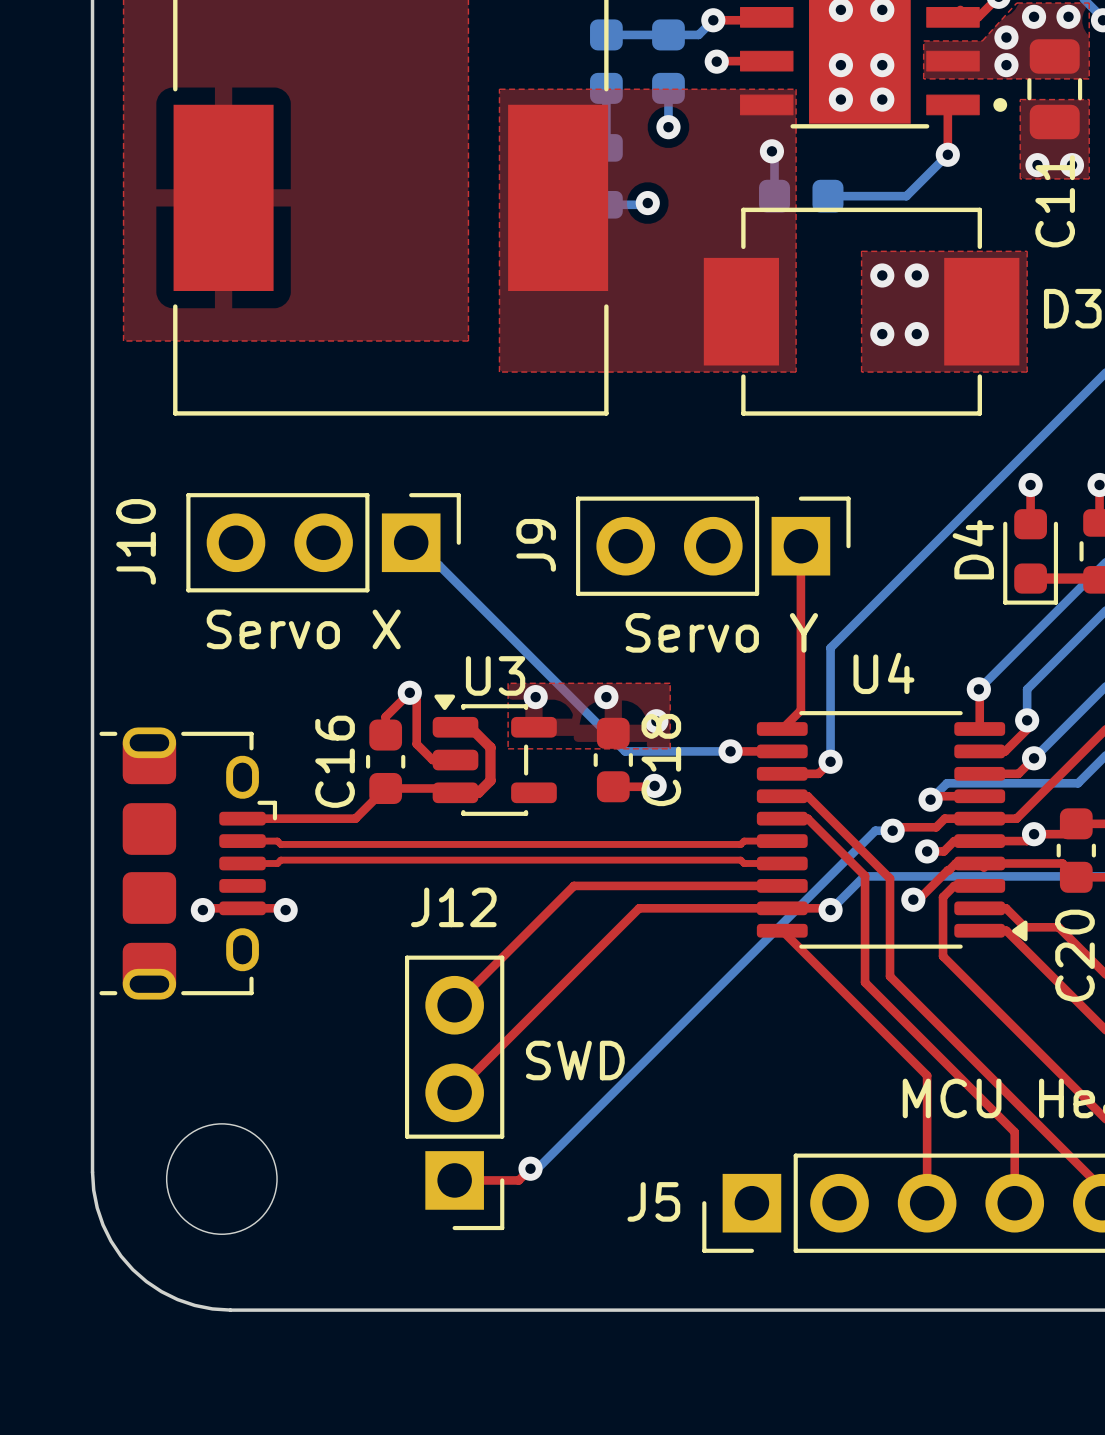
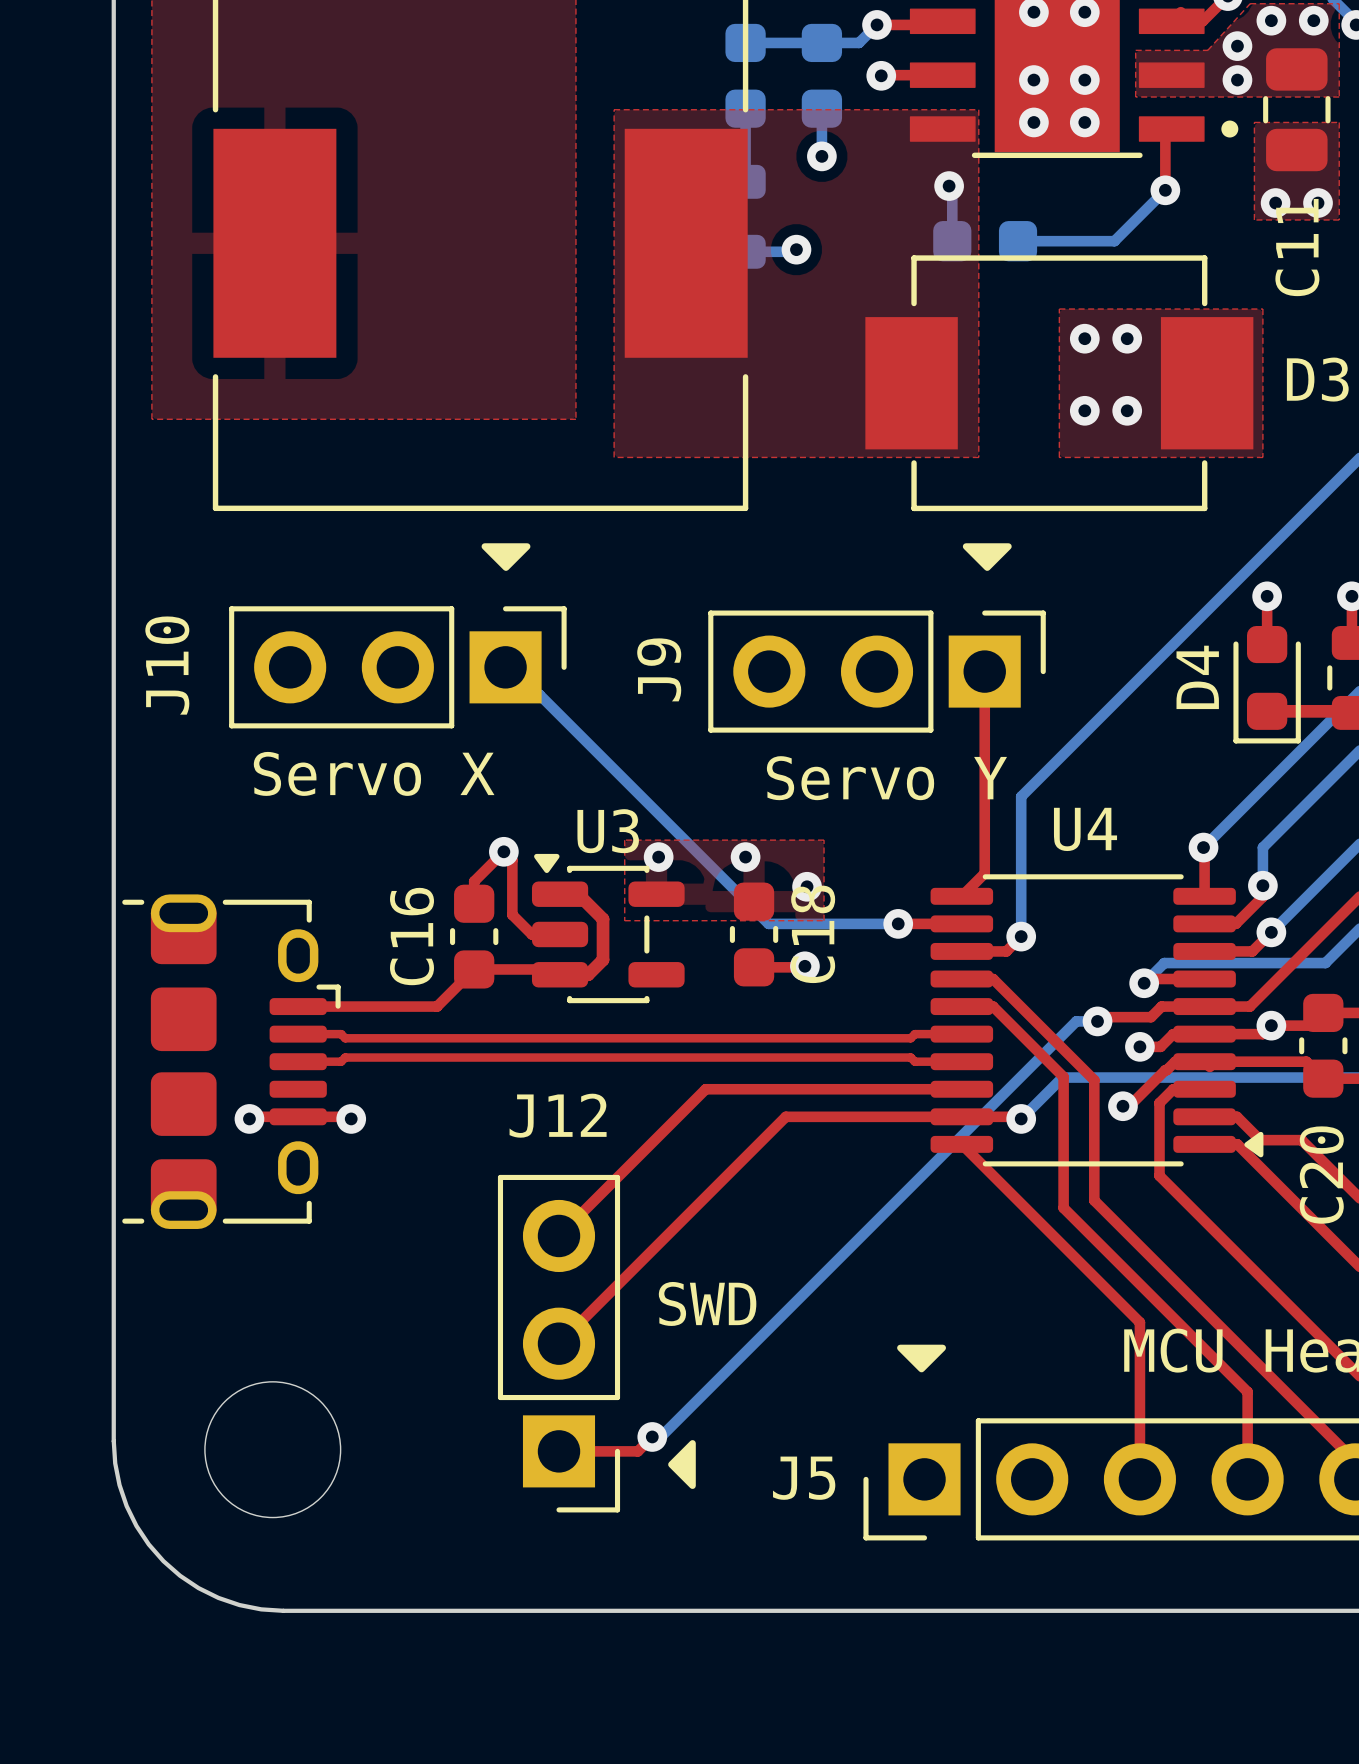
drawing: none -> [481, 543, 531, 571]
drawing: none -> [962, 543, 1012, 571]
drawing: none -> [897, 1344, 946, 1373]
drawing: none -> [668, 1440, 696, 1489]

